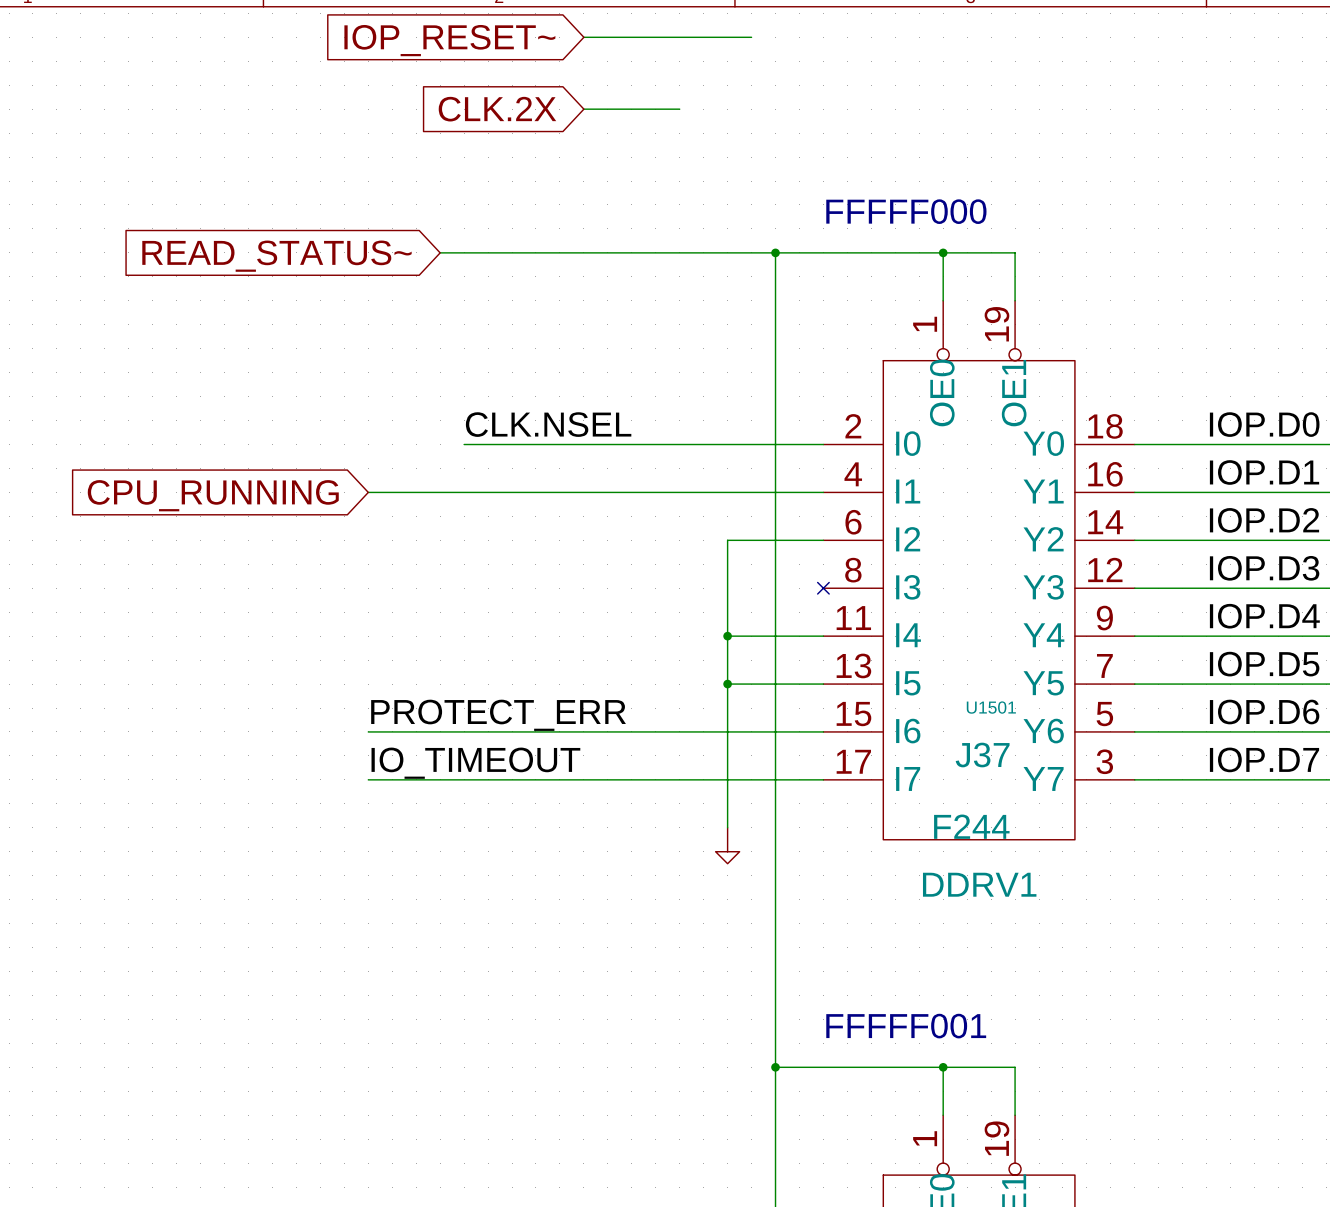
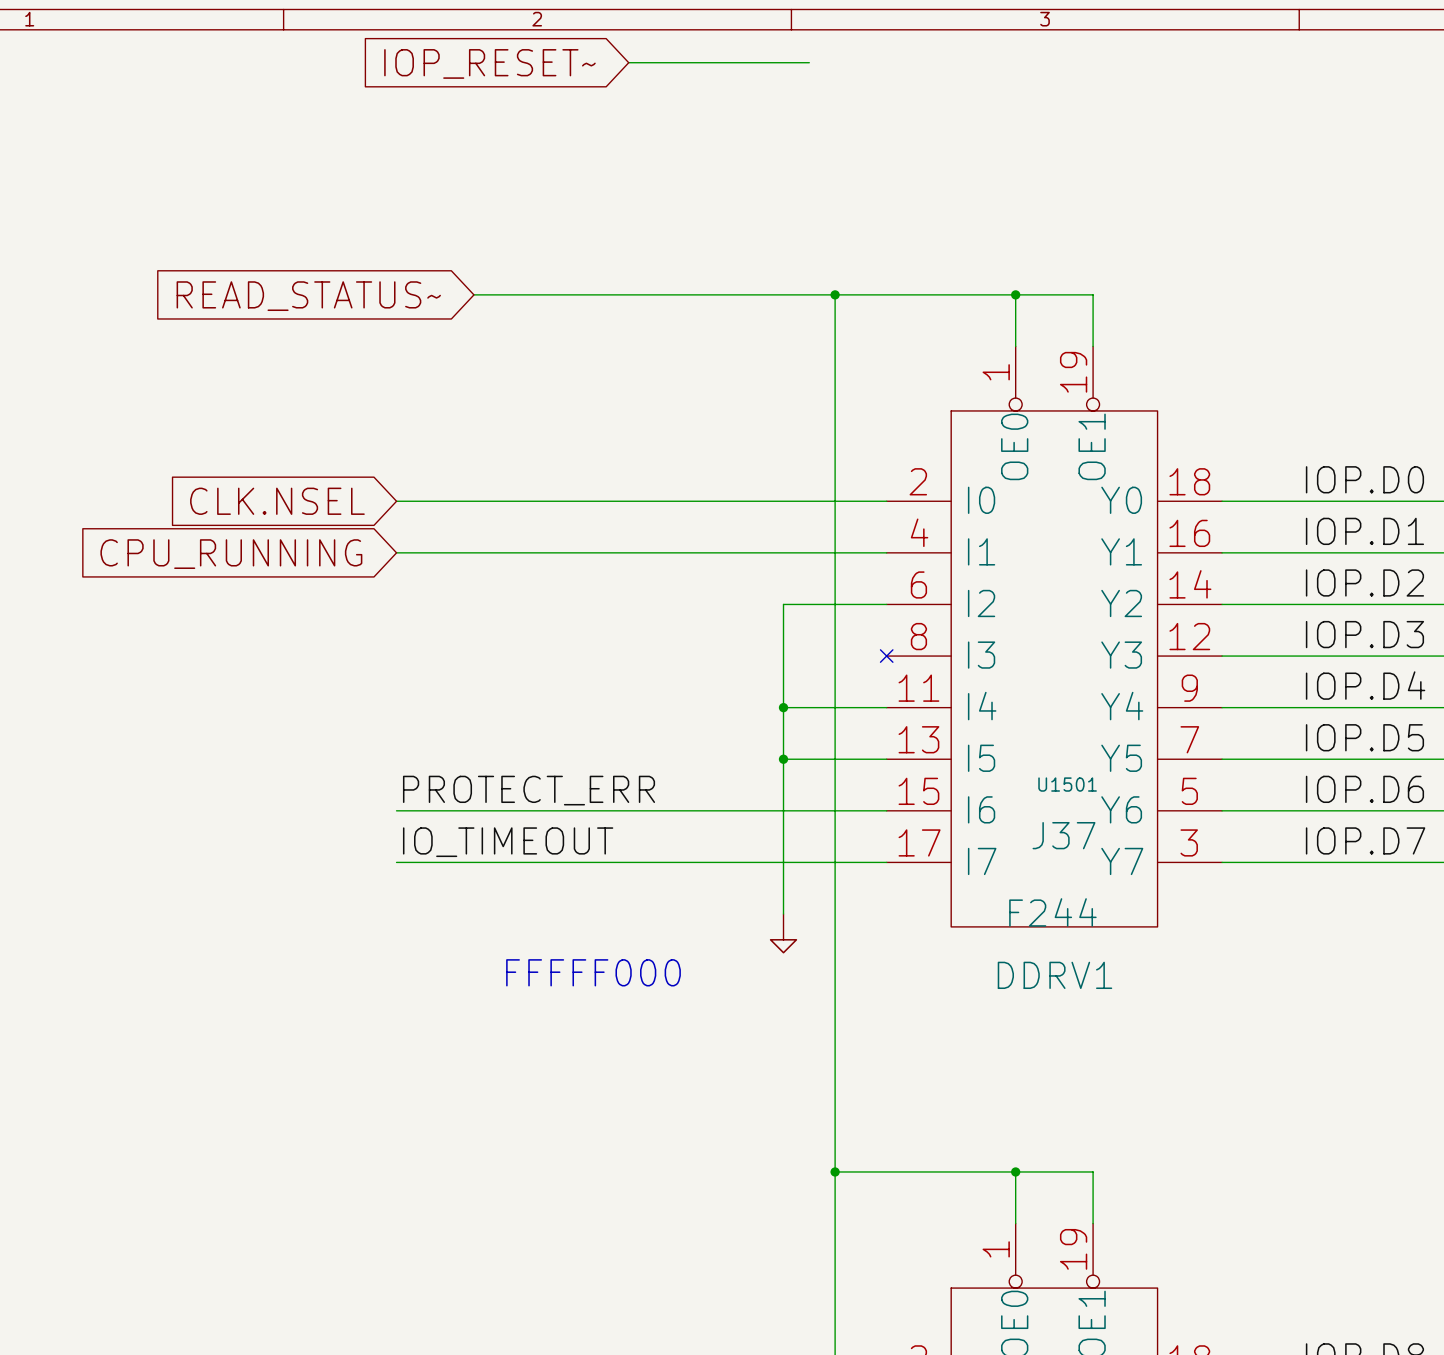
global label: CLK.2X (497, 109) -> none
wire: (583, 109) (679, 109) -> none
text: FFFFF000 (906, 211) -> none
label: CLK.NSEL (548, 424) -> none
global label: none -> CLK.NSEL (277, 501)
wire: none -> (396, 501) (499, 501)
text: none -> FFFFF000 (593, 972)
text: FFFFF001 (906, 1026) -> none

